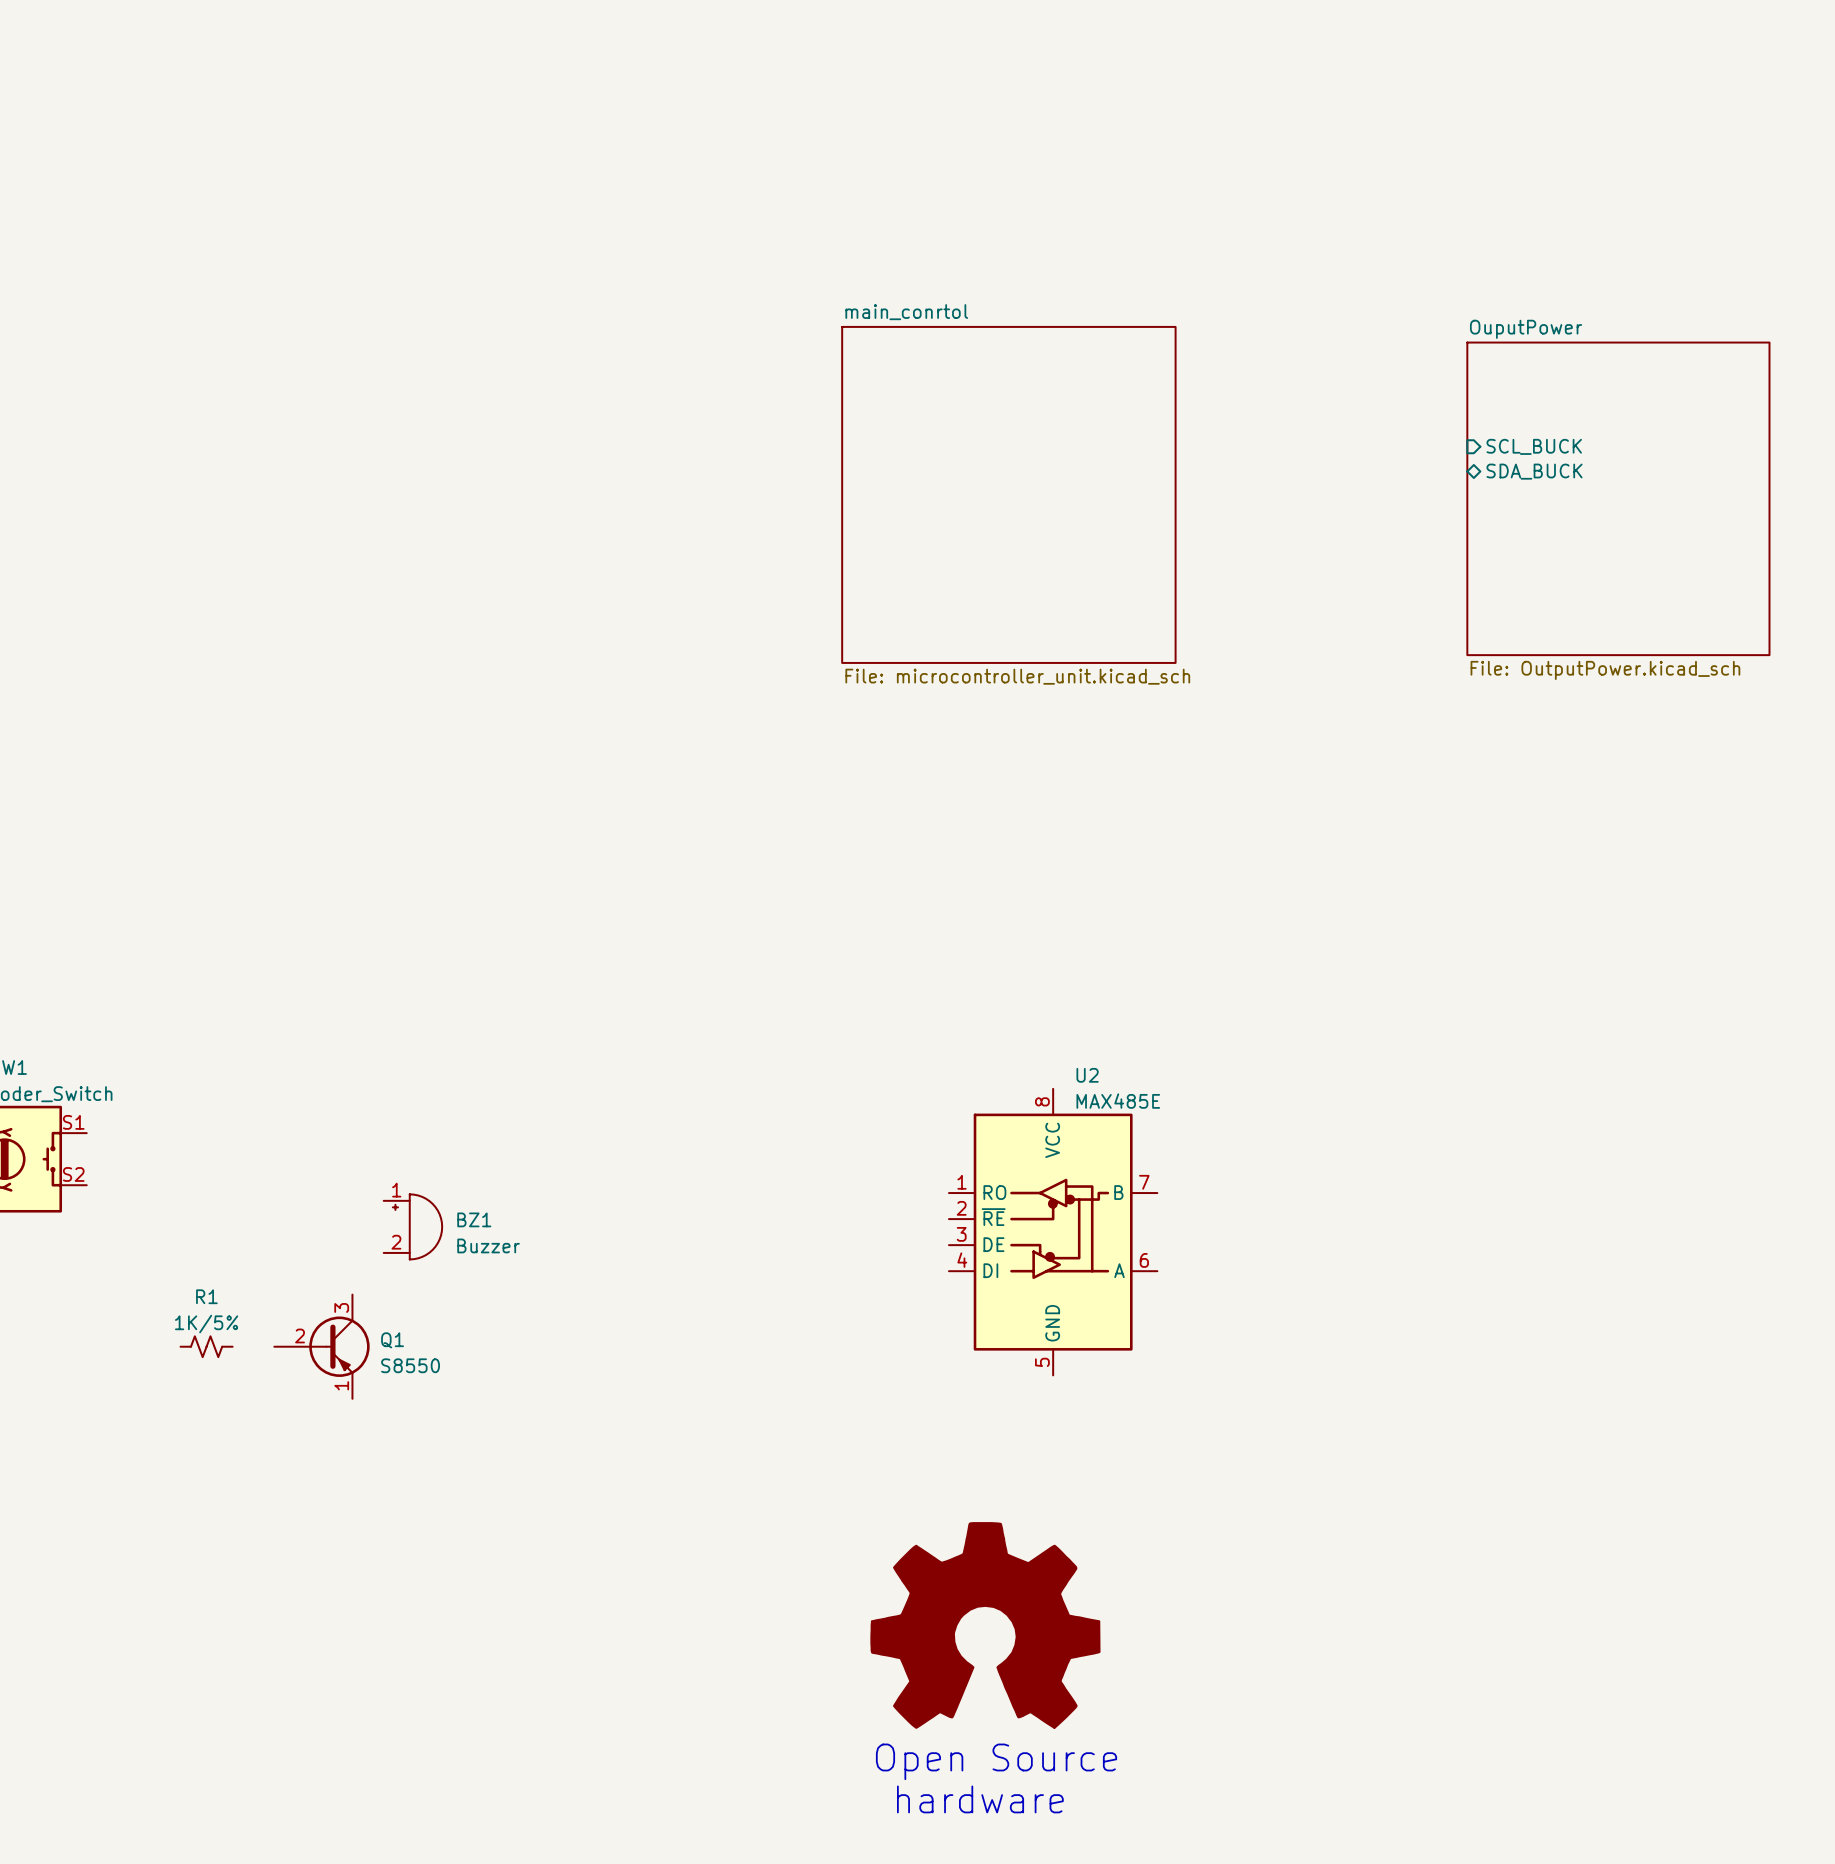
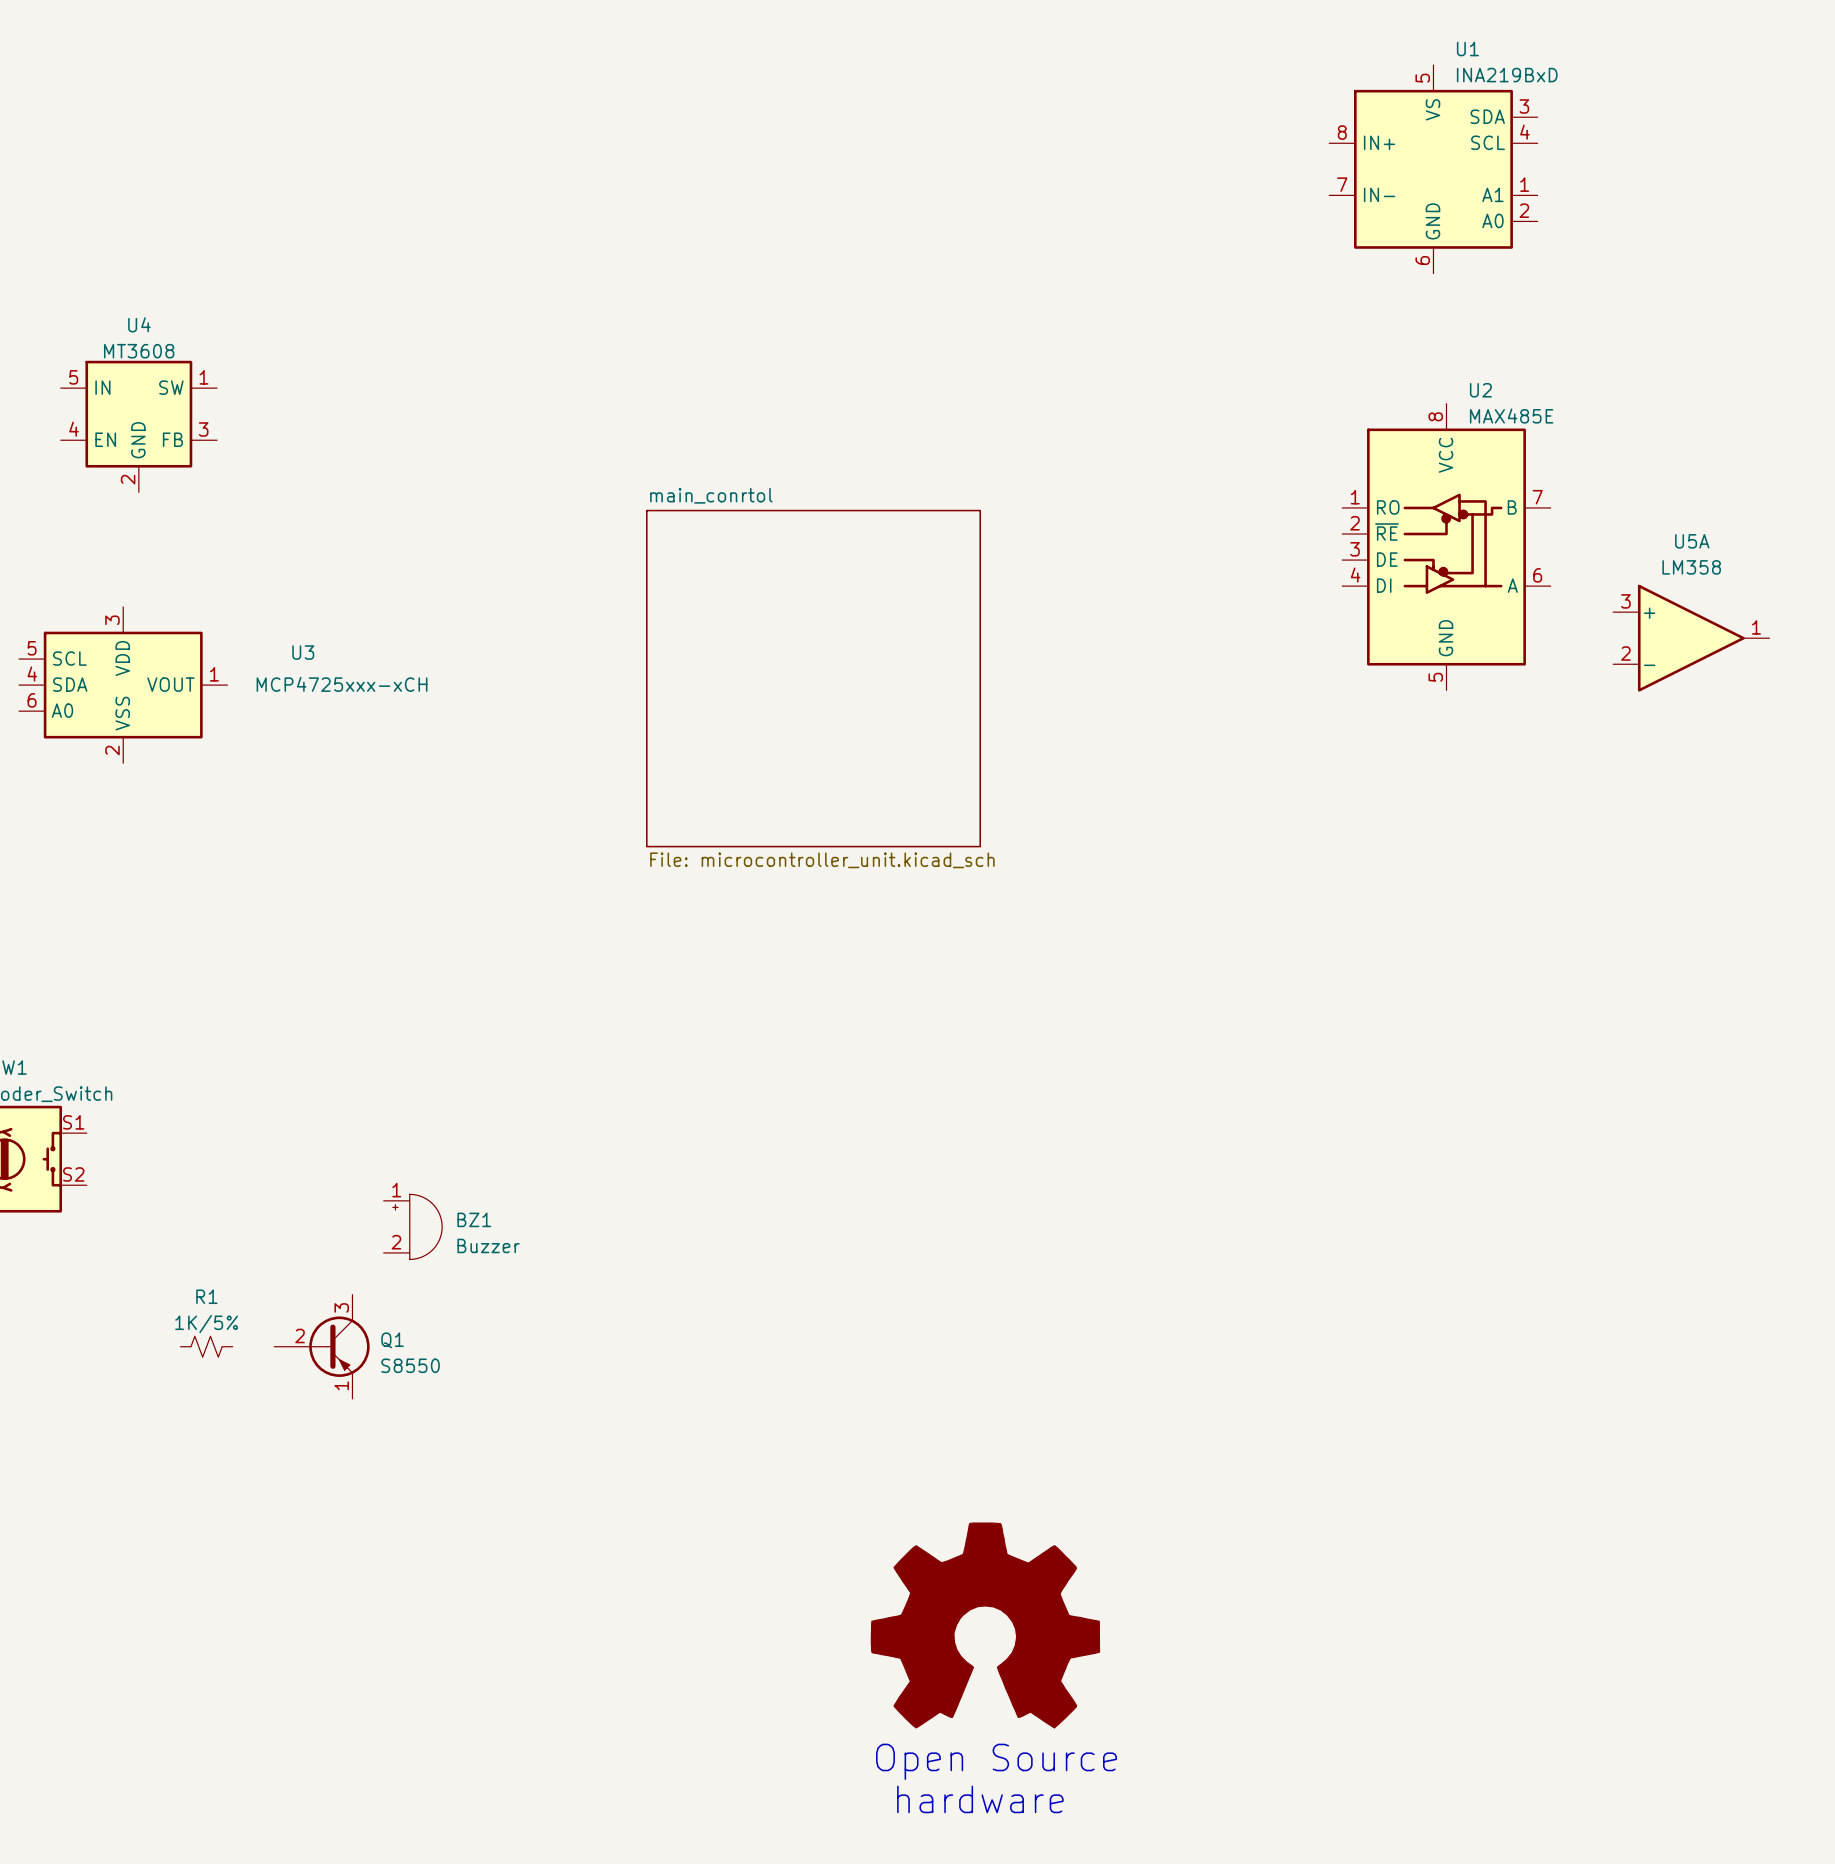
U1: none -> INA219BxD (1433, 169)
U4: none -> MT3608 (138, 426)
sheet pin: SCL_BUCK (1534, 446) -> none
sheet pin: SDA_BUCK (1534, 471) -> none
sheet main_conrtol: File: microcontroller_unit.kicad_sch (1008, 494) -> none
sheet OuputPower: File: OutputPower.kicad_sch (1618, 498) -> none
U5A: none -> LM358 (1691, 638)
sheet main_conrtol: none -> File: microcontroller_unit.kicad_sch (813, 678)
U3: none -> MCP4725xxx-xCH (123, 685)
U2 position: (1053, 1232) -> (1446, 547)

